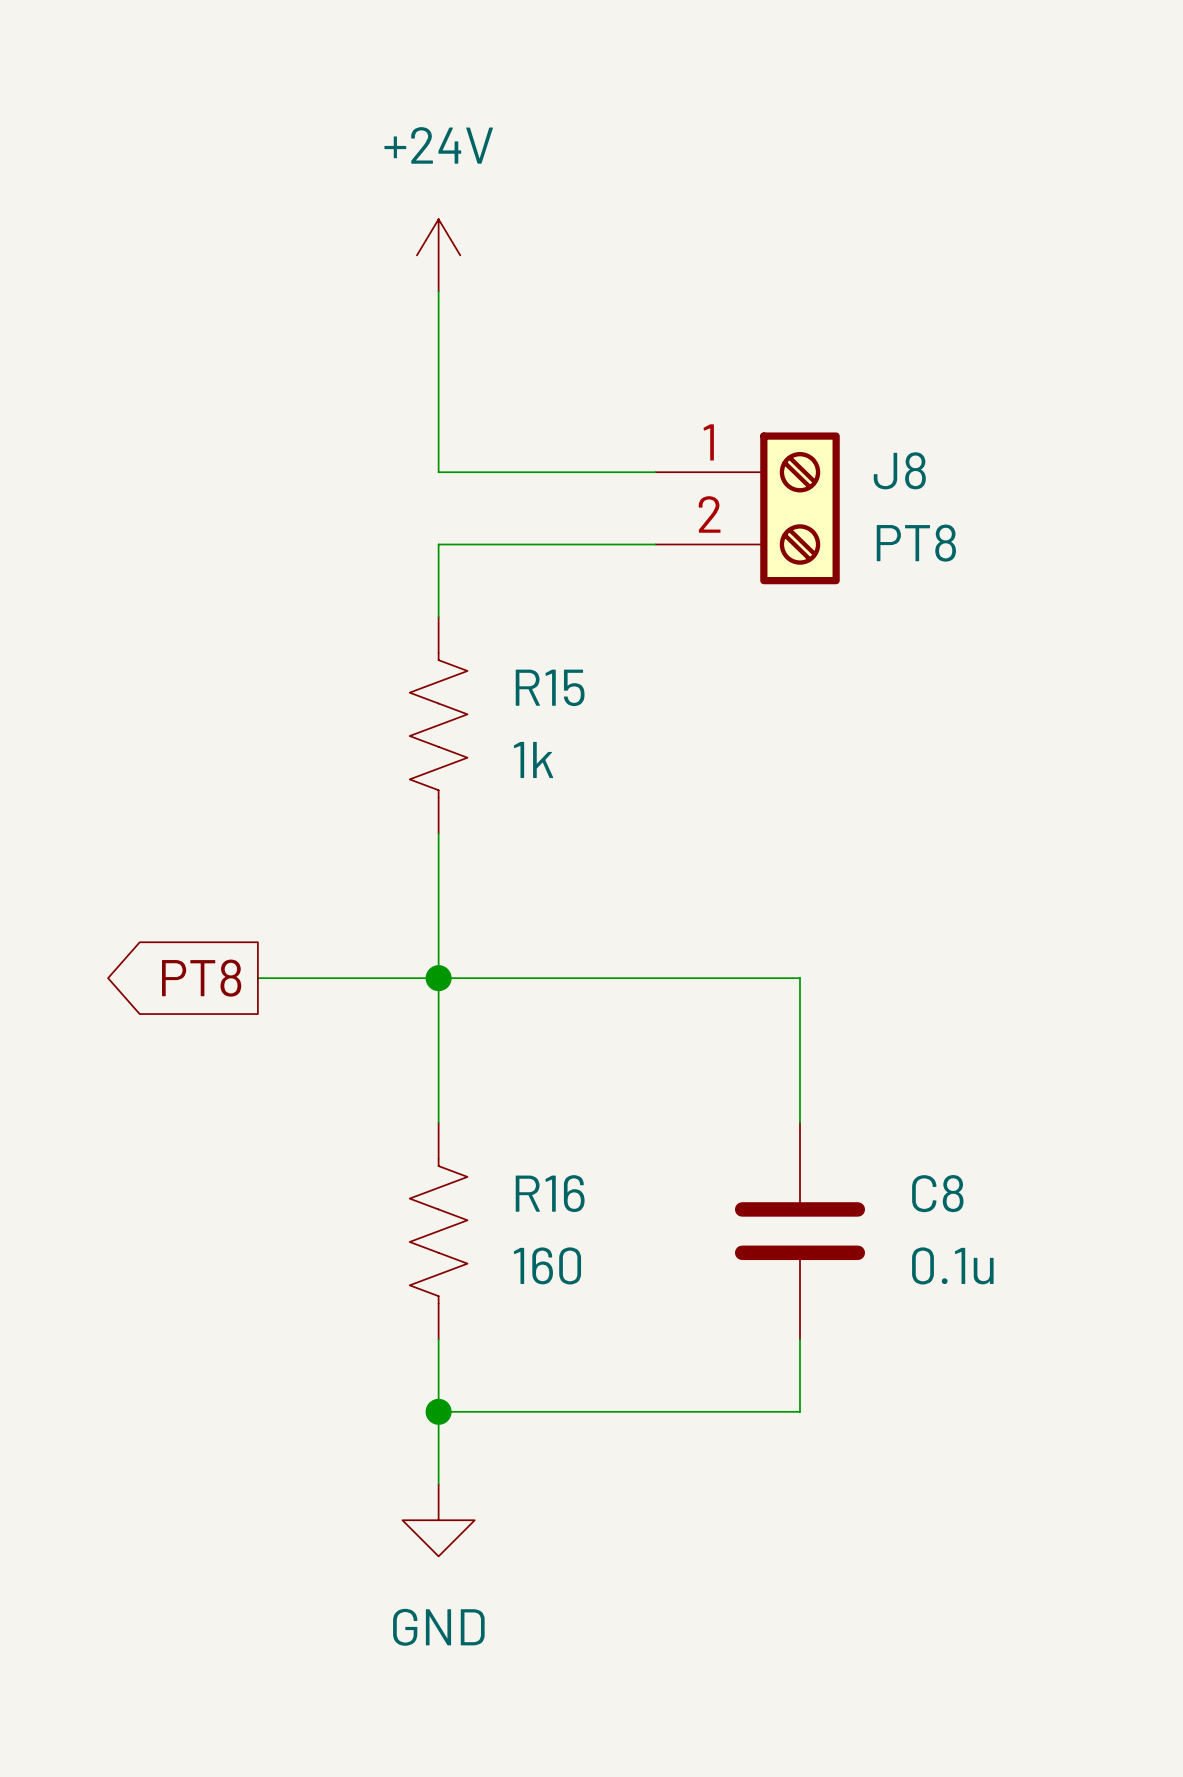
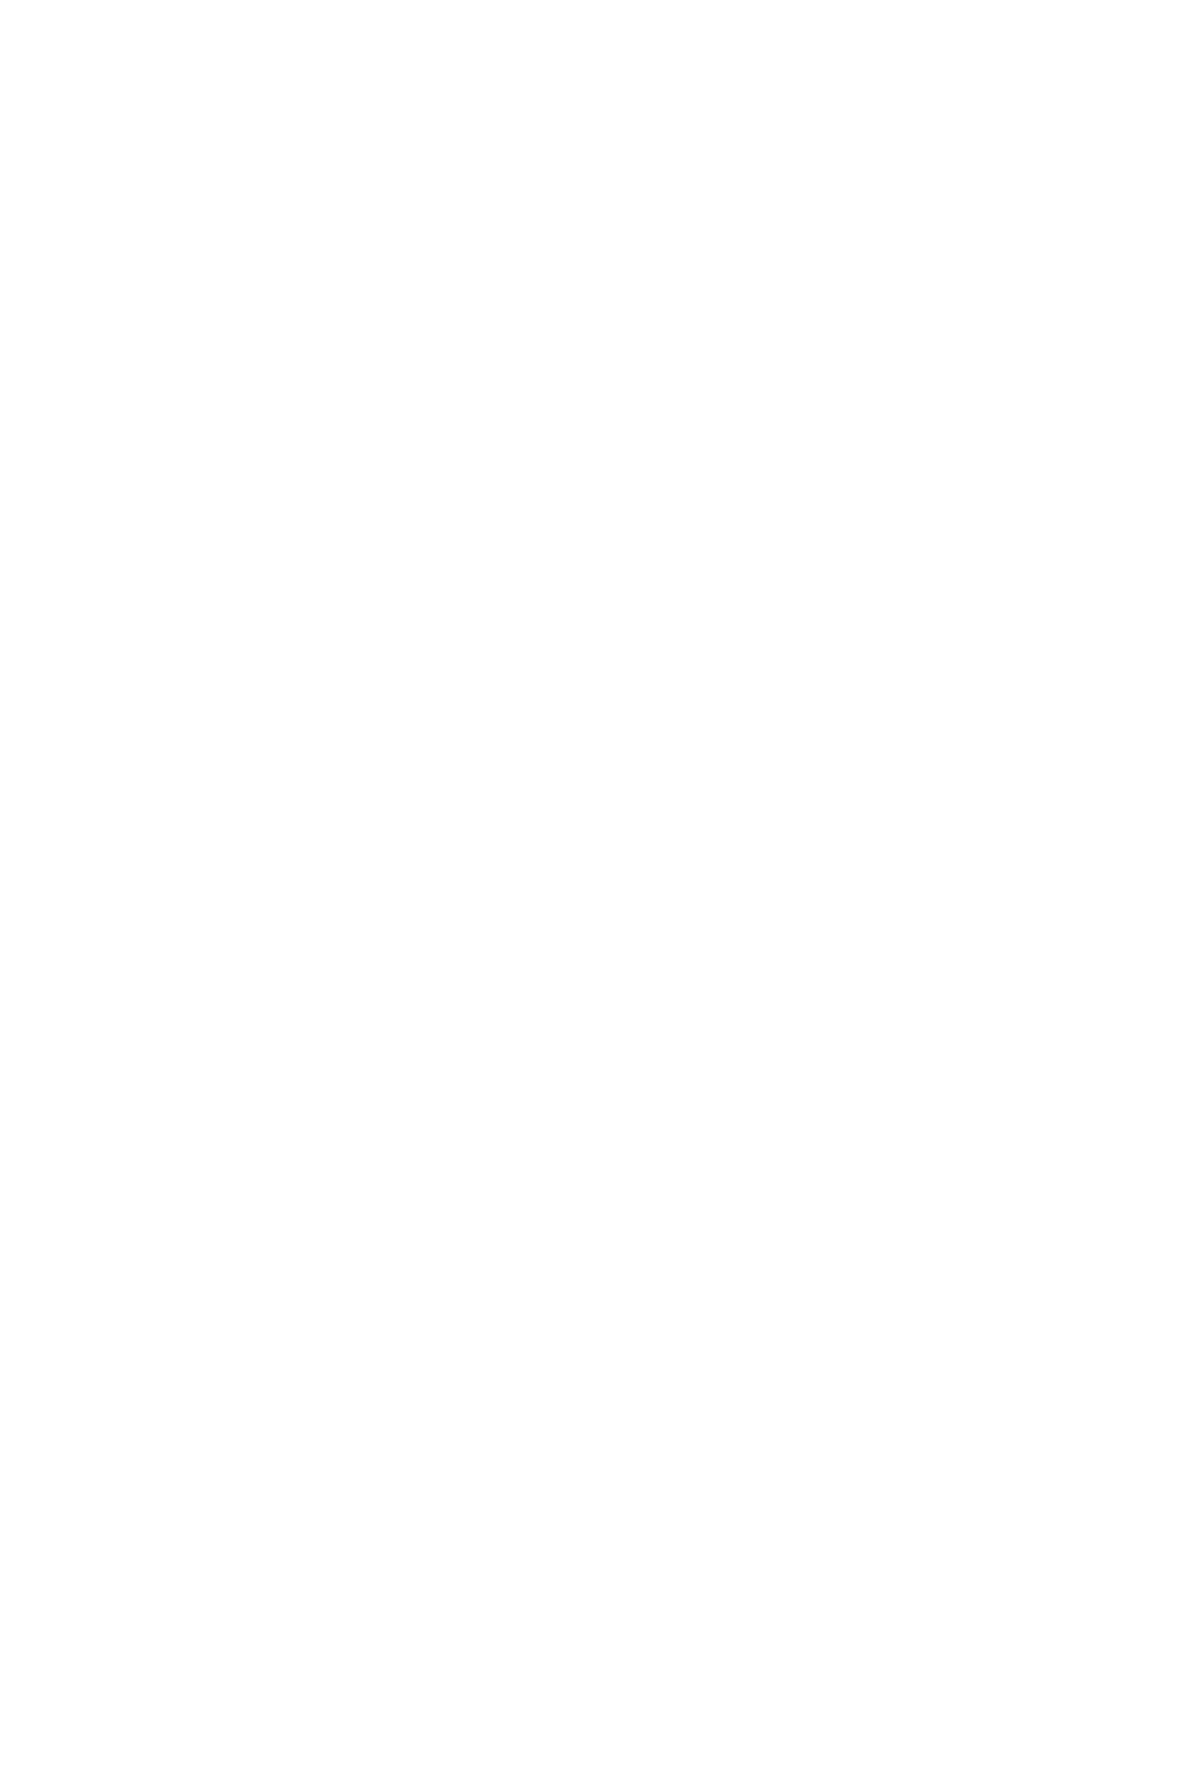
power symbol: +24V (438, 255) -> none
wire: (438, 291) (438, 472) (655, 472) -> none
J8: PT8 (747, 508) -> none
wire: (655, 544) (438, 544) (438, 616) -> none
R15: 1k (438, 725) -> none
wire: (438, 833) (438, 1122) -> none
global label: PT8 (201, 978) -> none
wire: (257, 978) (799, 978) (799, 1122) -> none
junction: (438, 978) -> none
R16: 160 (438, 1231) -> none
C8: 0.1u (799, 1231) -> none
wire: (438, 1339) (438, 1484) -> none
wire: (799, 1339) (799, 1411) (438, 1411) -> none
junction: (438, 1411) -> none
power symbol: GND (438, 1520) -> none

